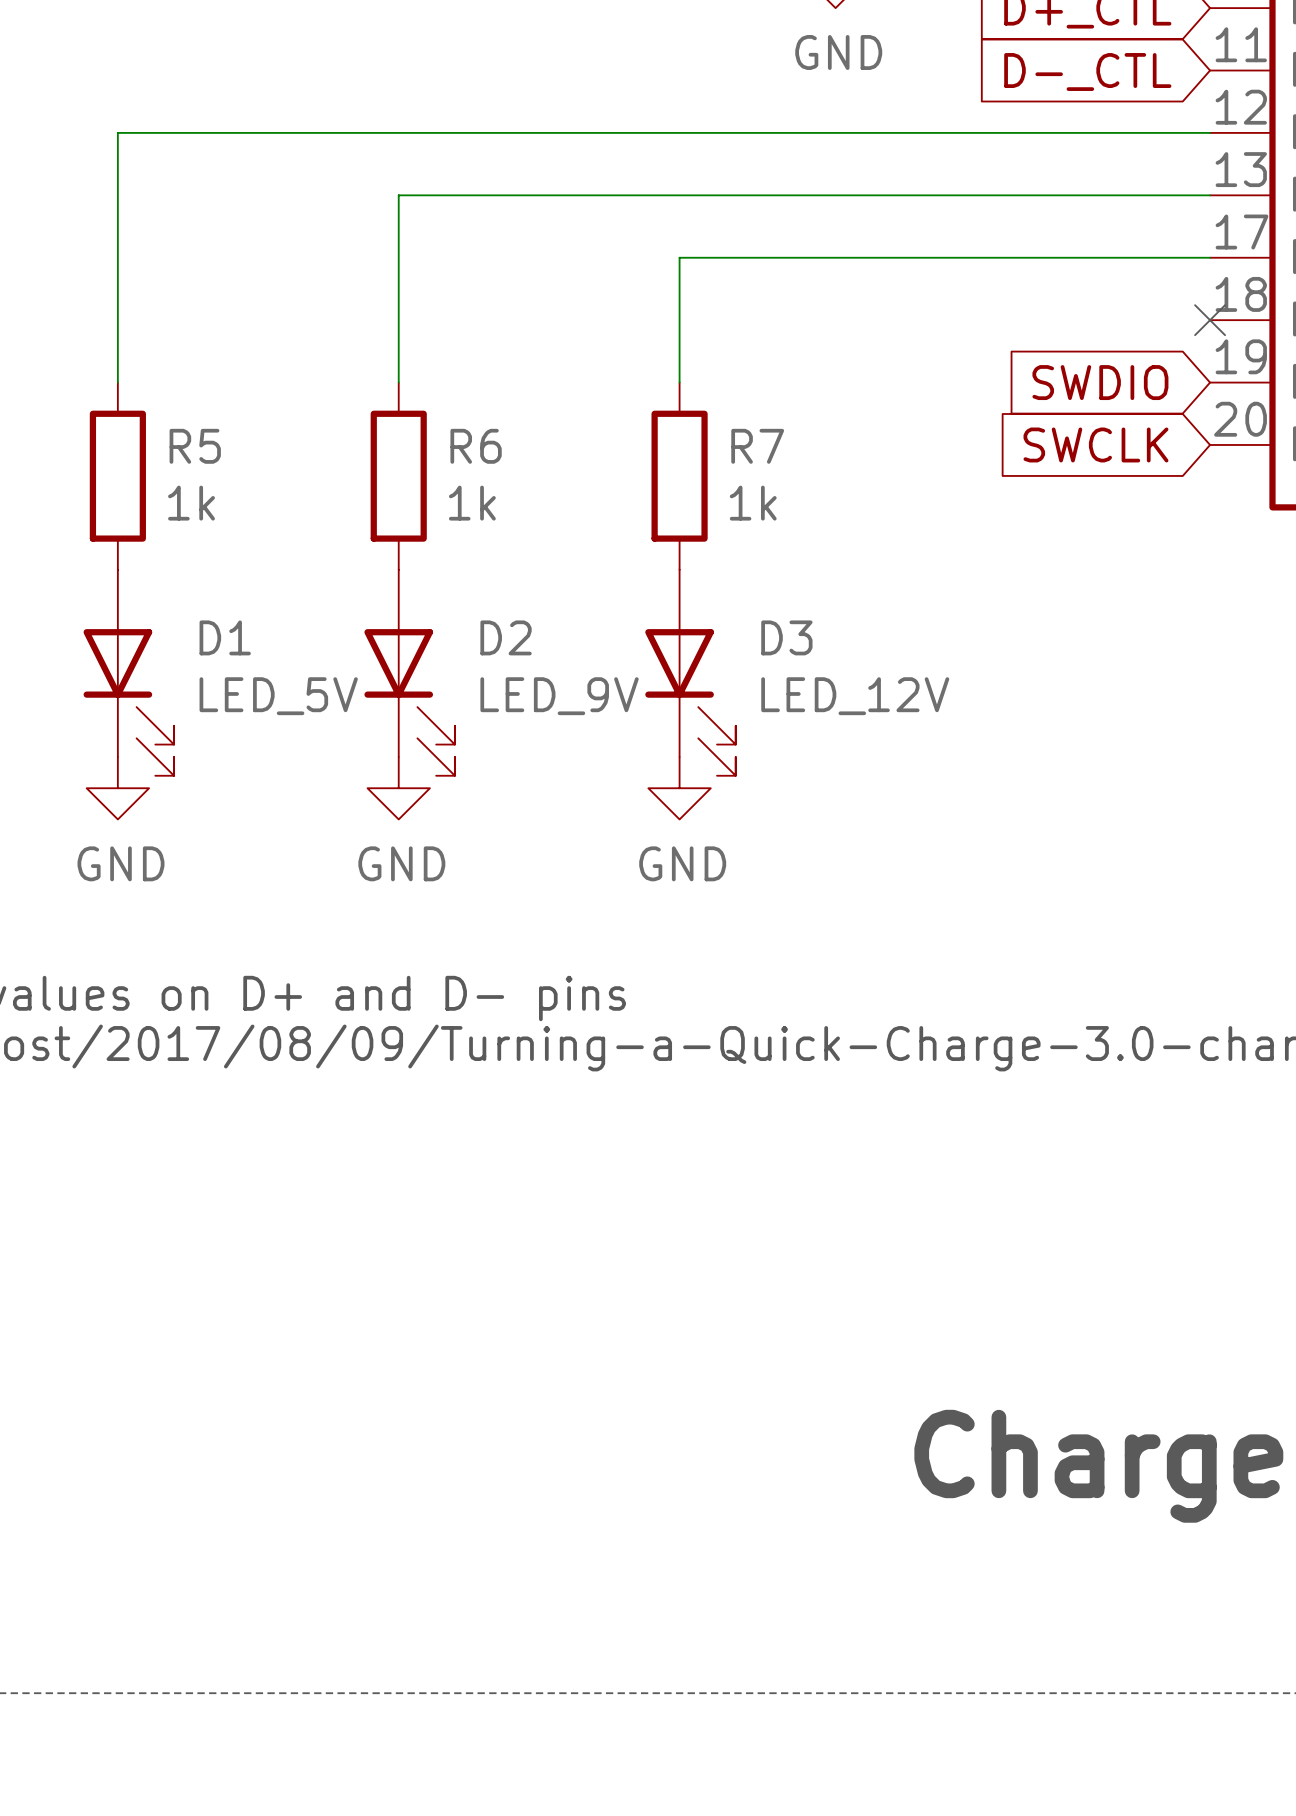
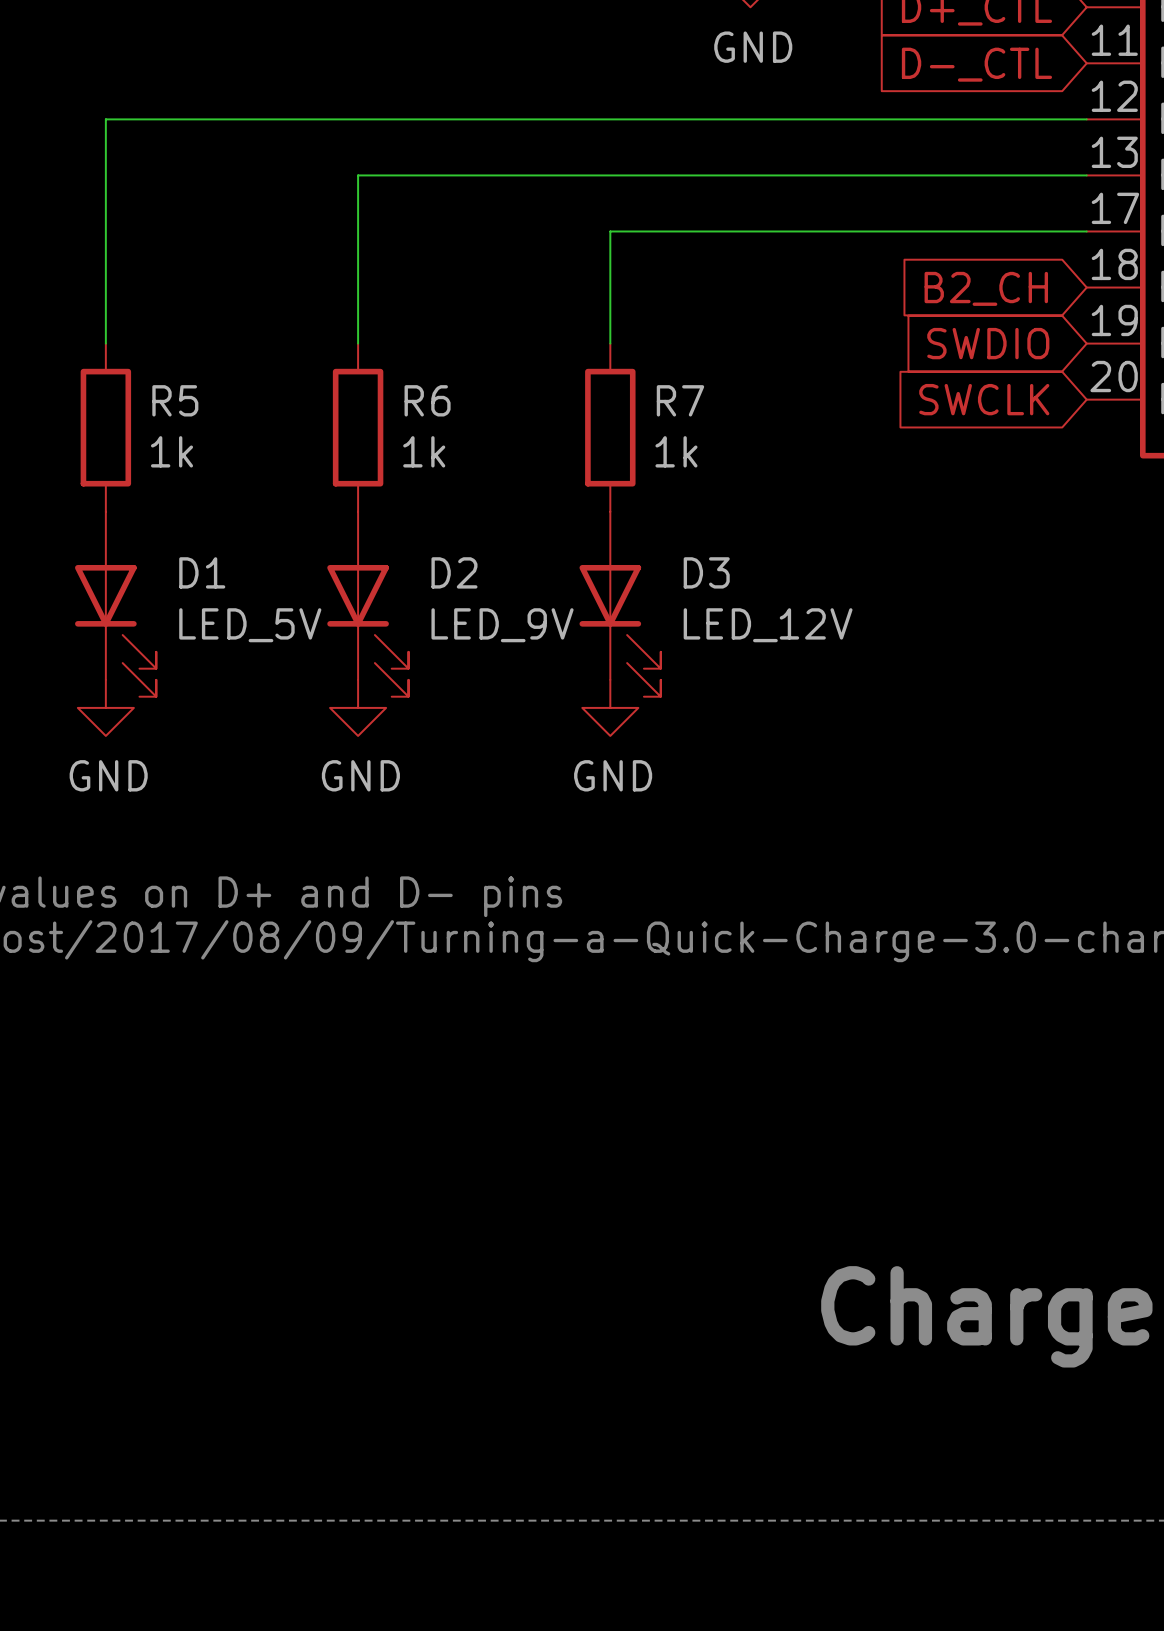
no-connect mark: (1210, 320) -> none
global label: none -> B2_CH (986, 288)

